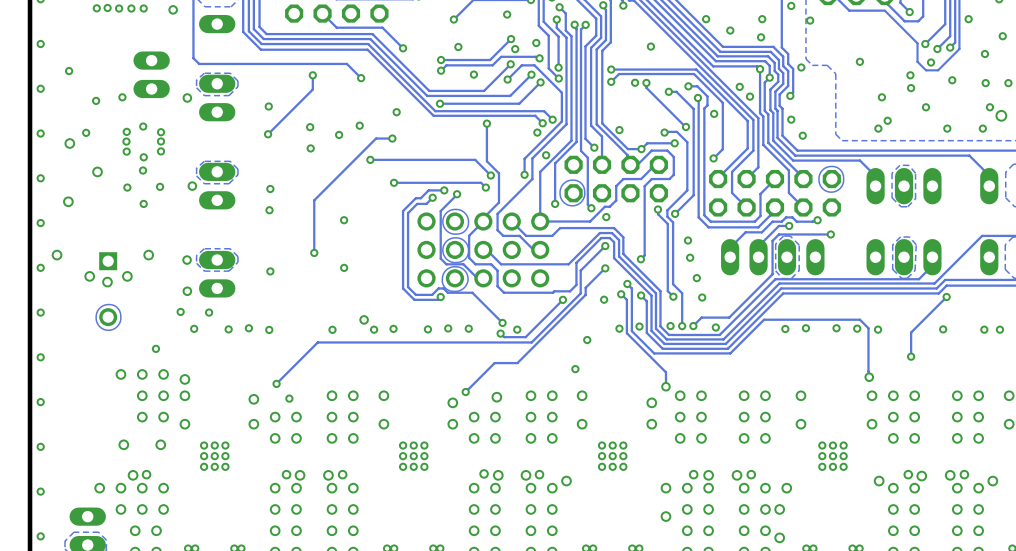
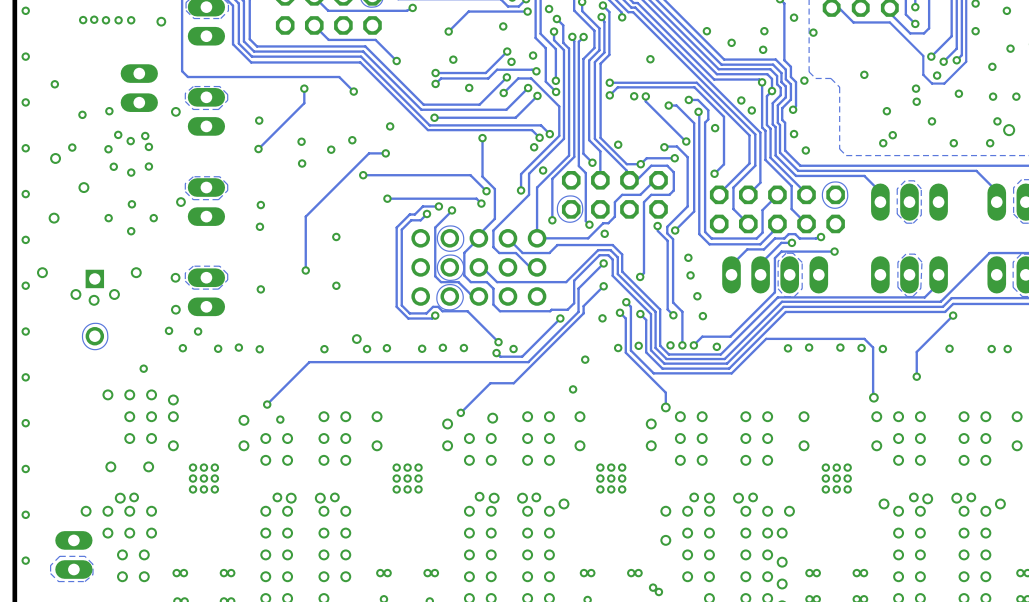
via: none -> (118, 134)
via: none -> (145, 136)
via: (126, 131) -> none
via: none -> (108, 149)
via: (126, 141) -> none
via: (161, 141) -> none
via: (143, 170) -> none
via: (160, 186) -> none
via: (127, 187) -> none
via: none -> (131, 204)
via: none -> (108, 218)
via: none -> (153, 218)
via: (143, 203) -> none
via: none -> (131, 231)

